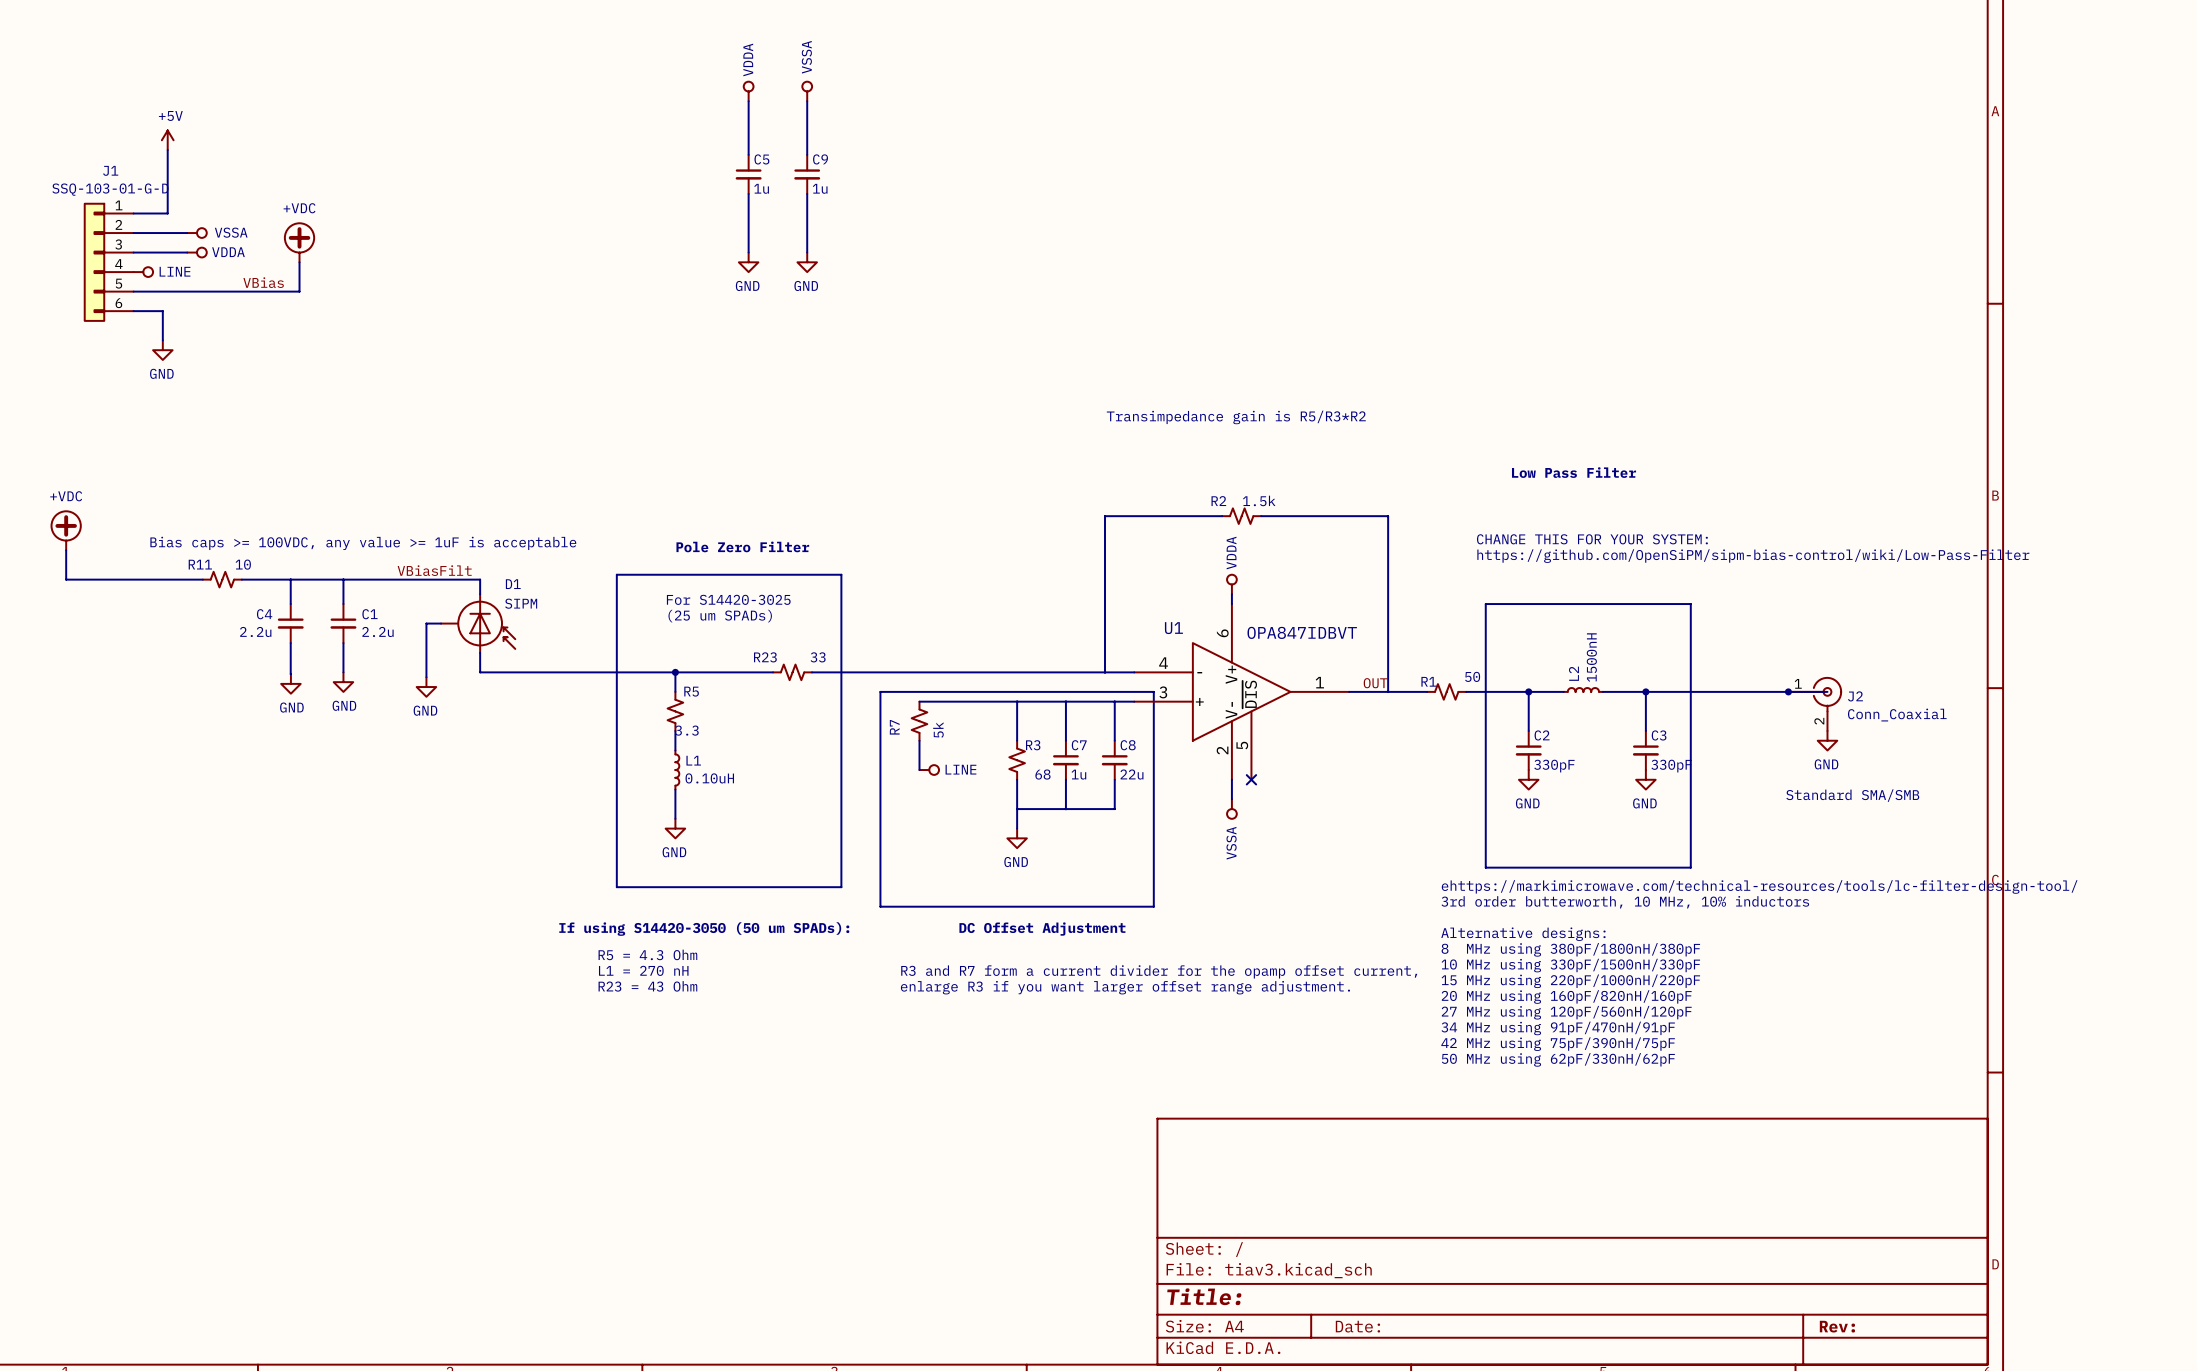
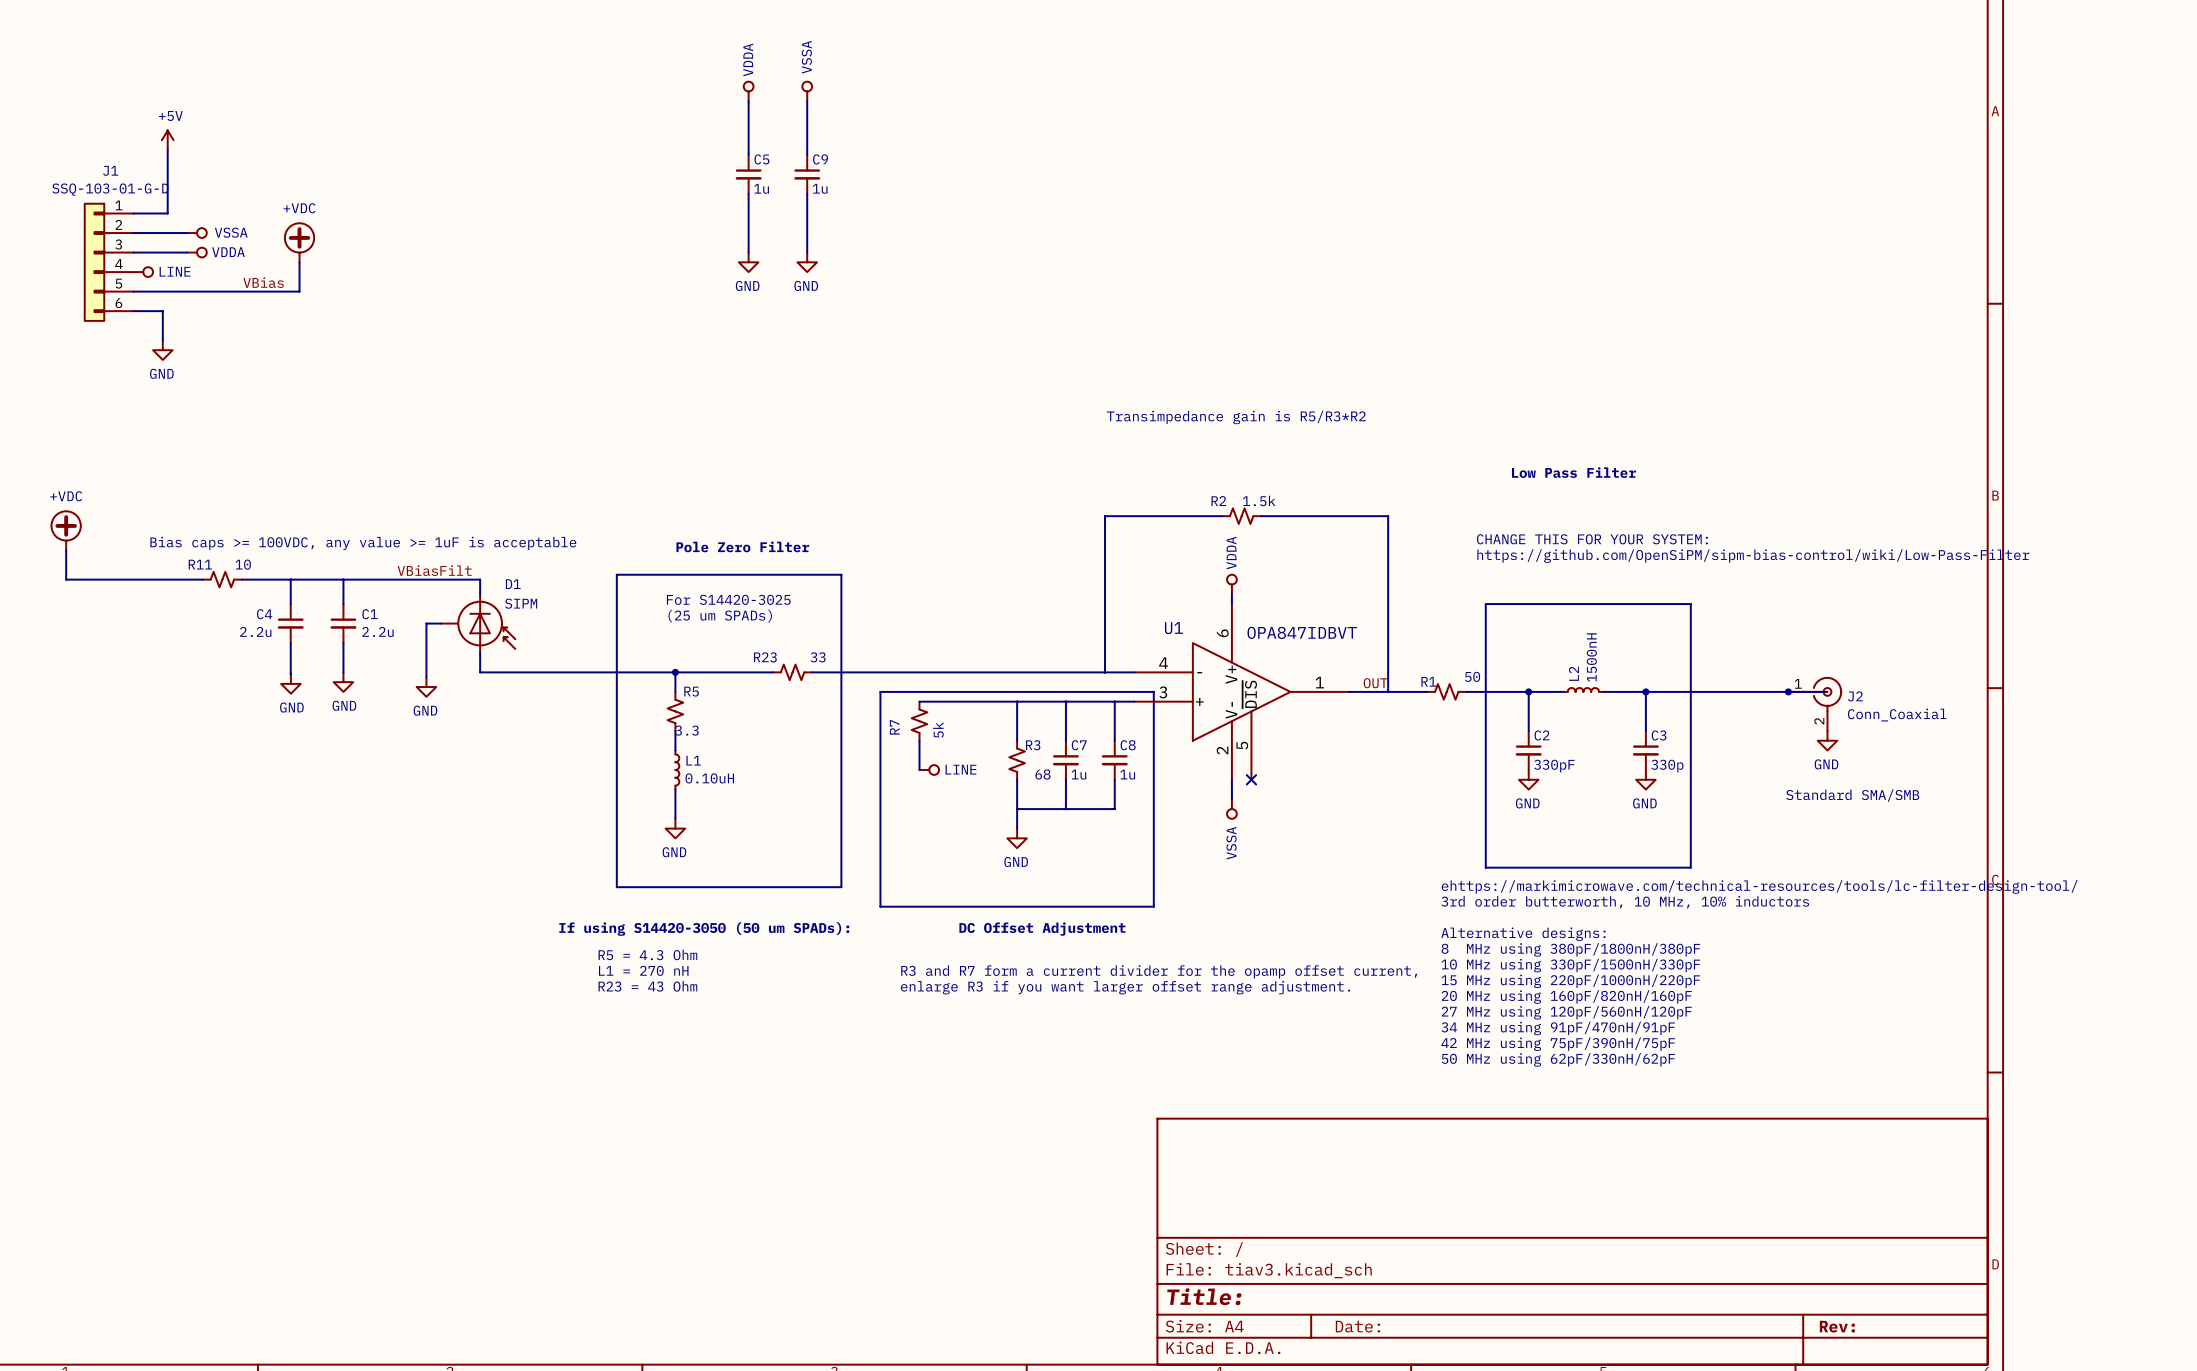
C3 value: 330pF (1671, 766) -> 330p (1667, 766)
C8 value: 22u (1132, 774) -> 1u (1127, 774)

